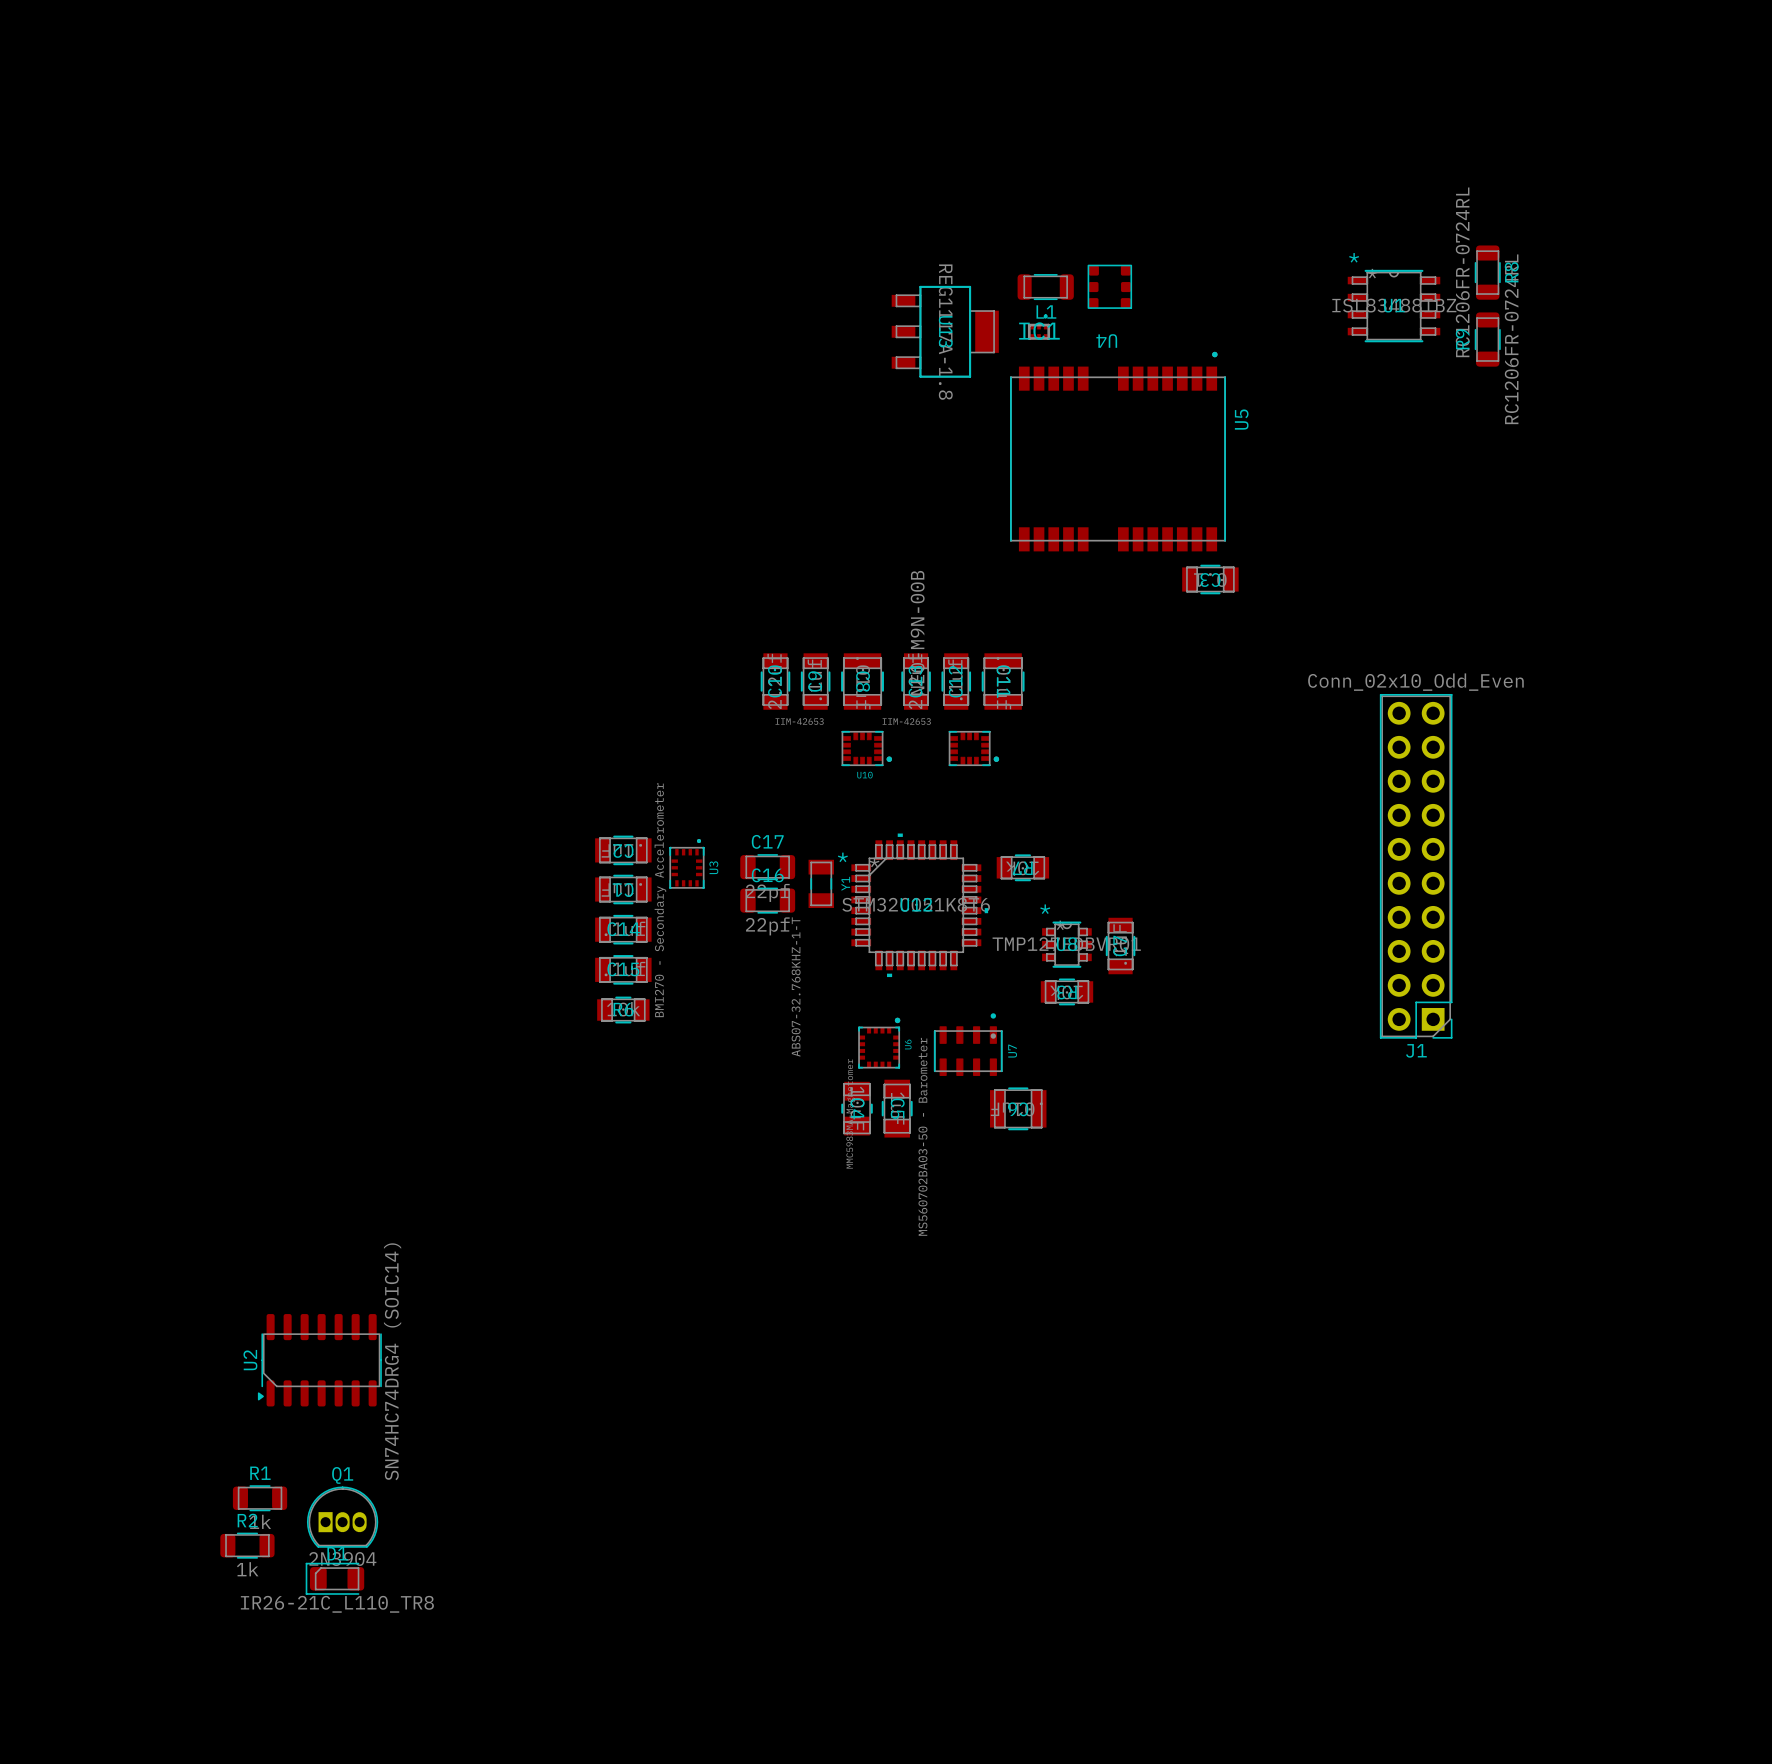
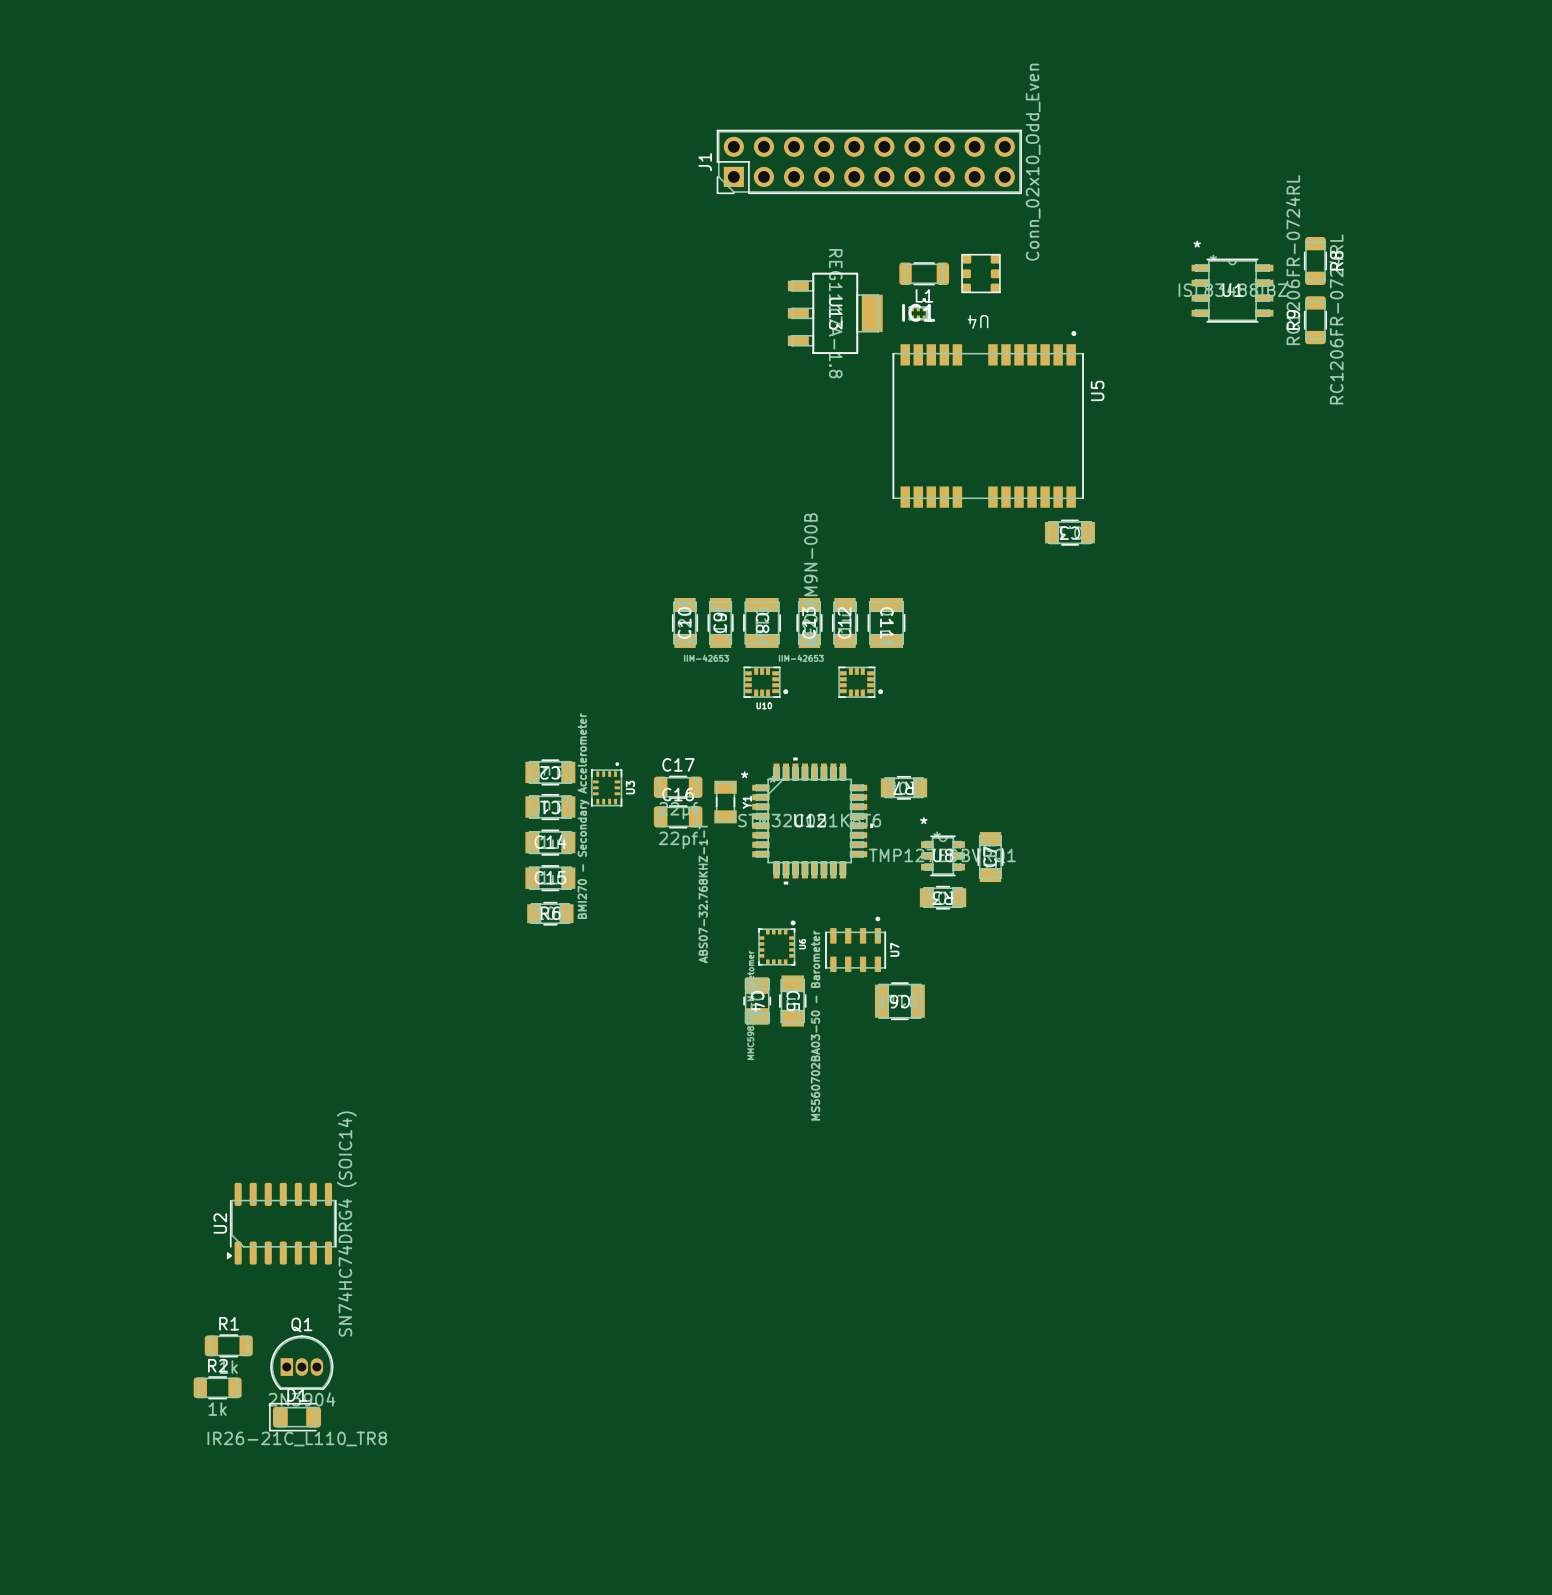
J1 rotation: 0° (1416, 866) -> 90° clockwise (869, 161)
J1 position: (1416, 866) -> (869, 161)

